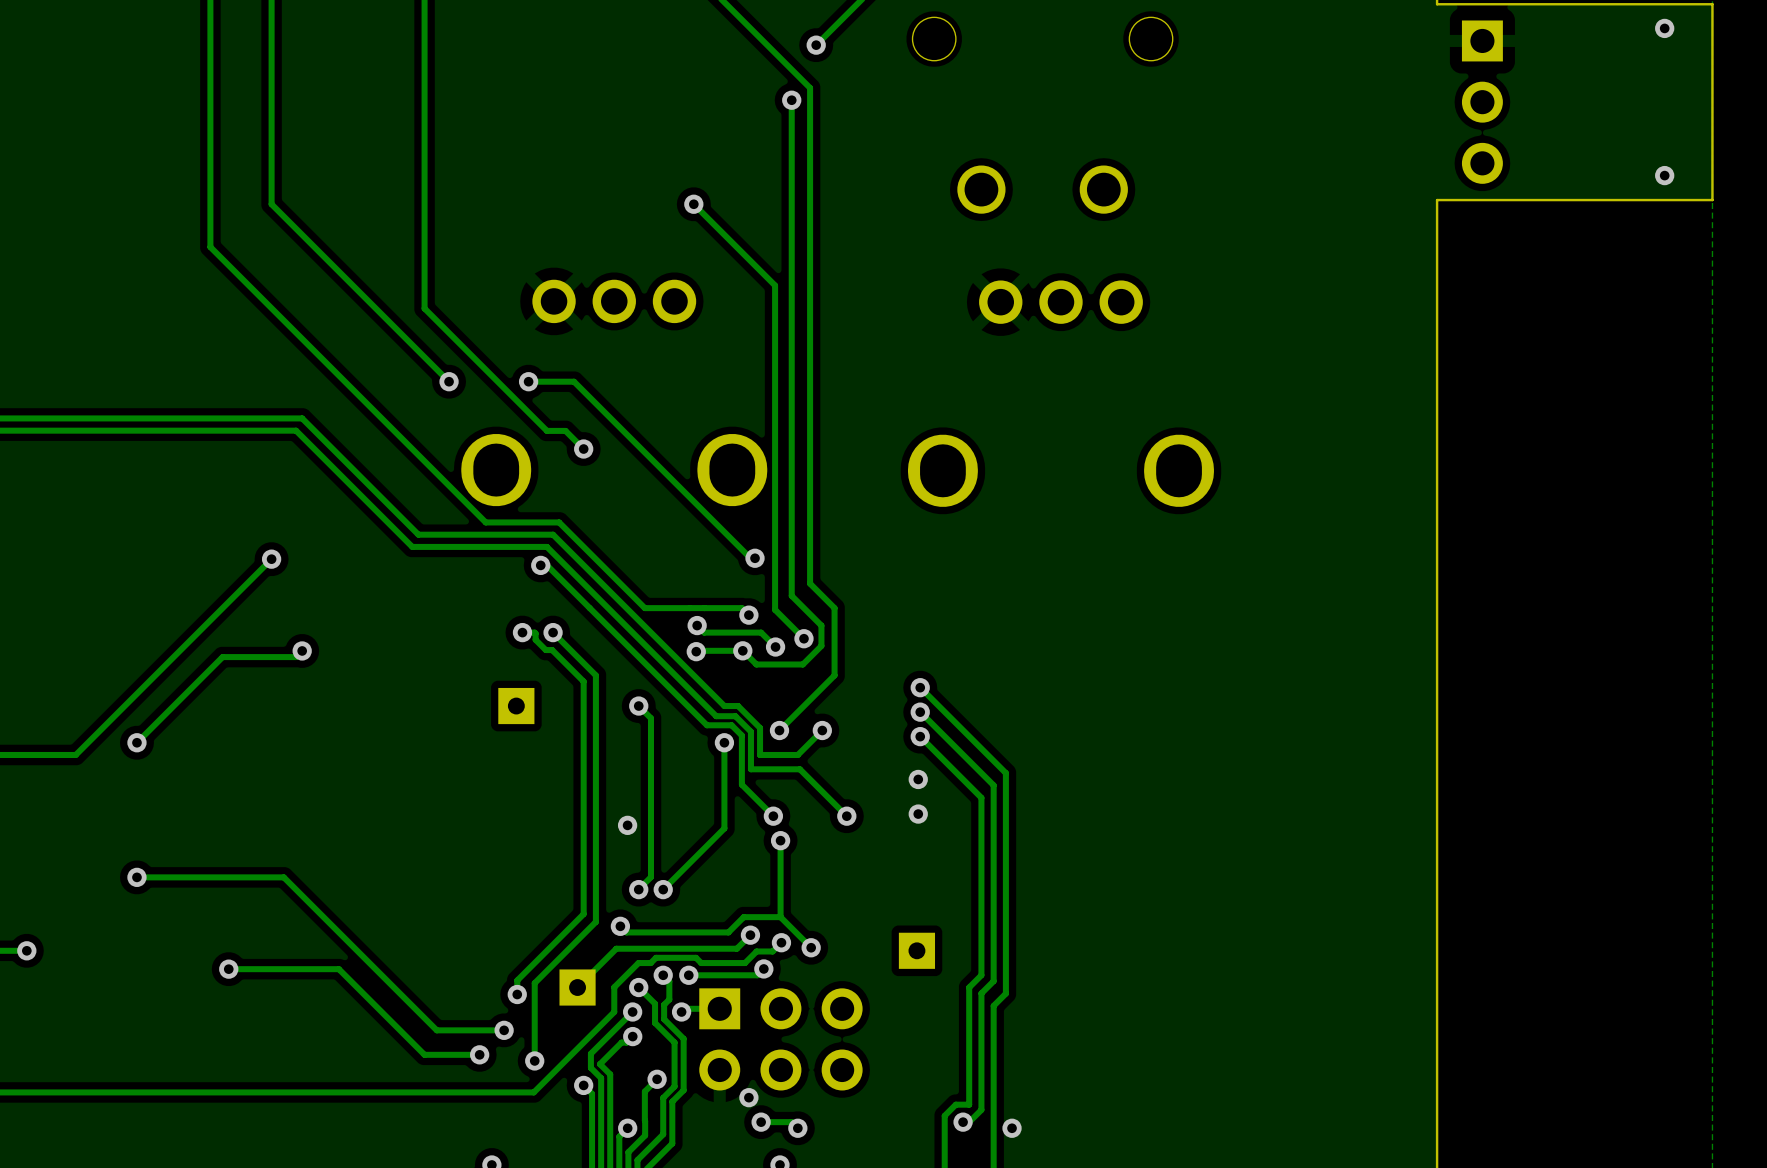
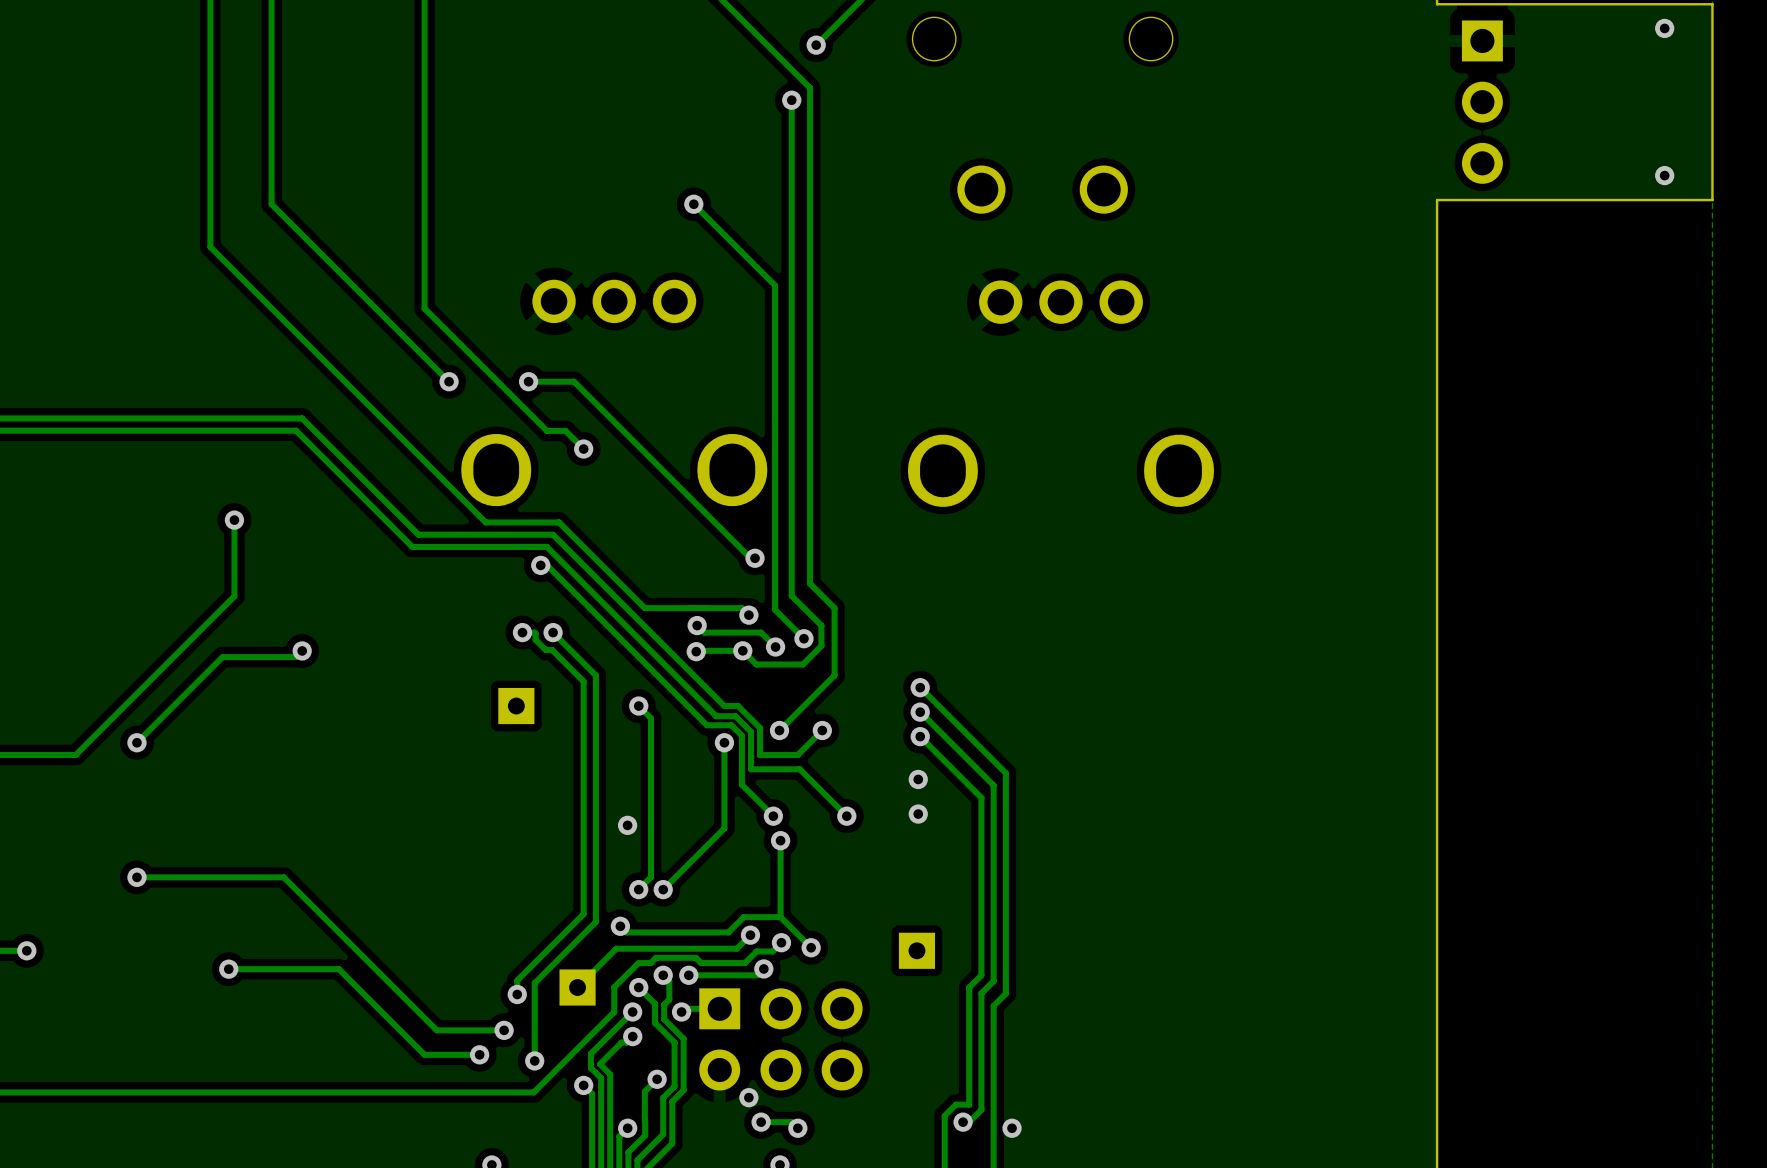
track: (271, 559) (234, 596) -> (234, 520) (234, 596)
via position: (271, 559) -> (234, 520)

